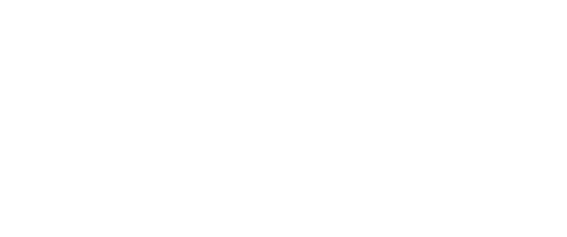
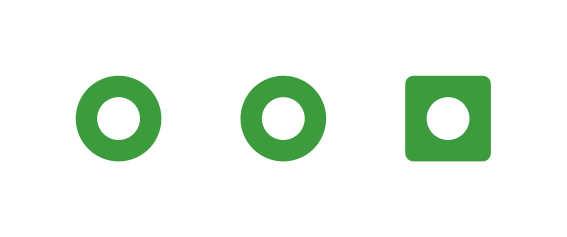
part: none -> (283, 118)

